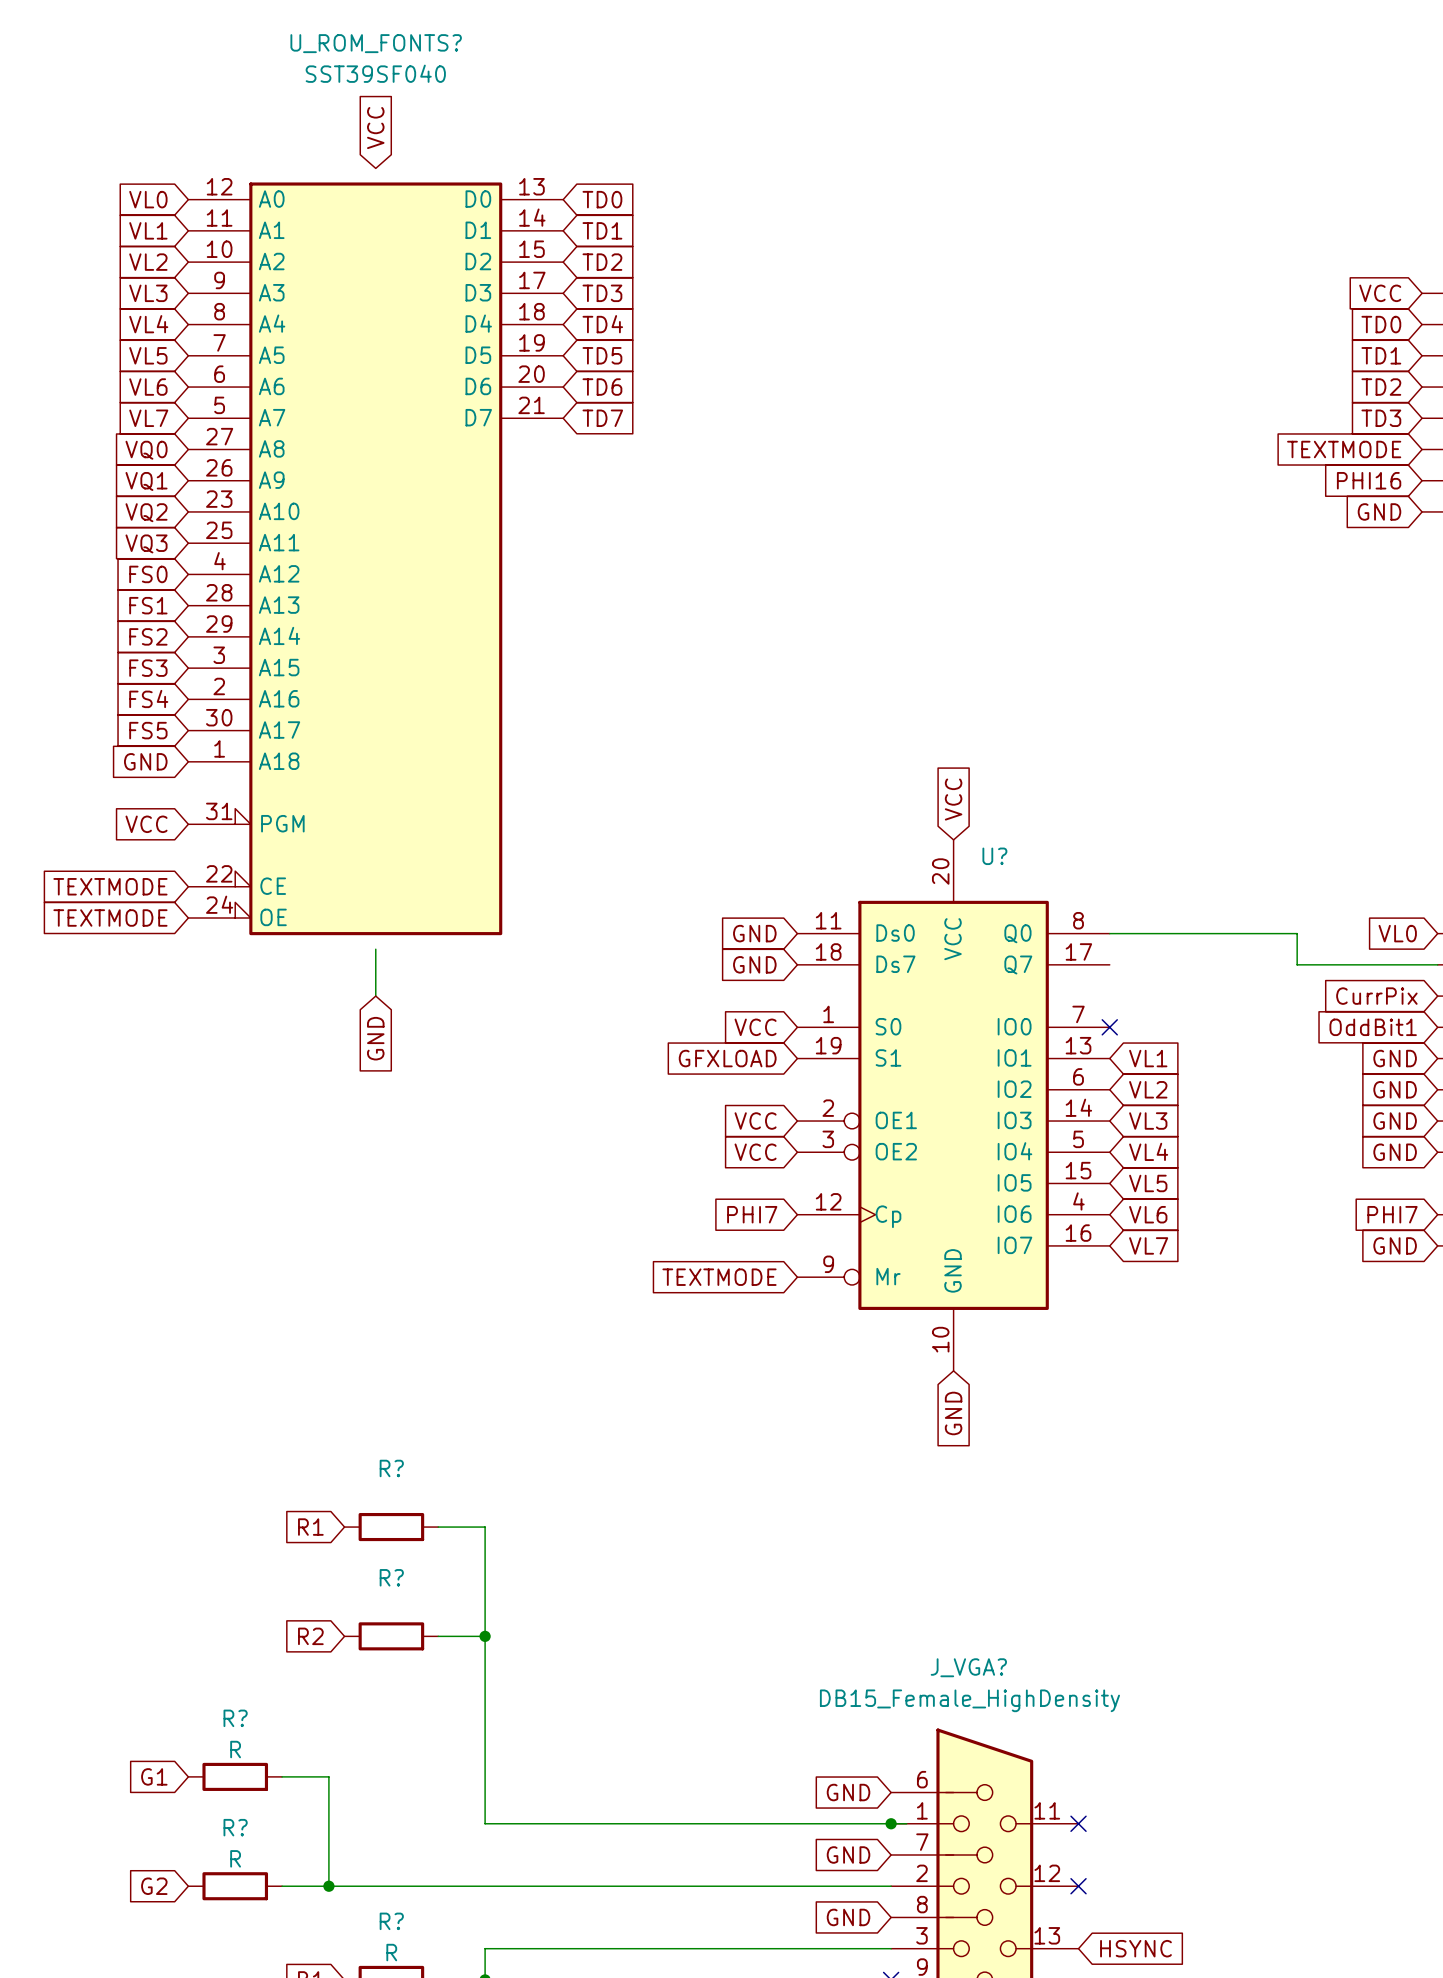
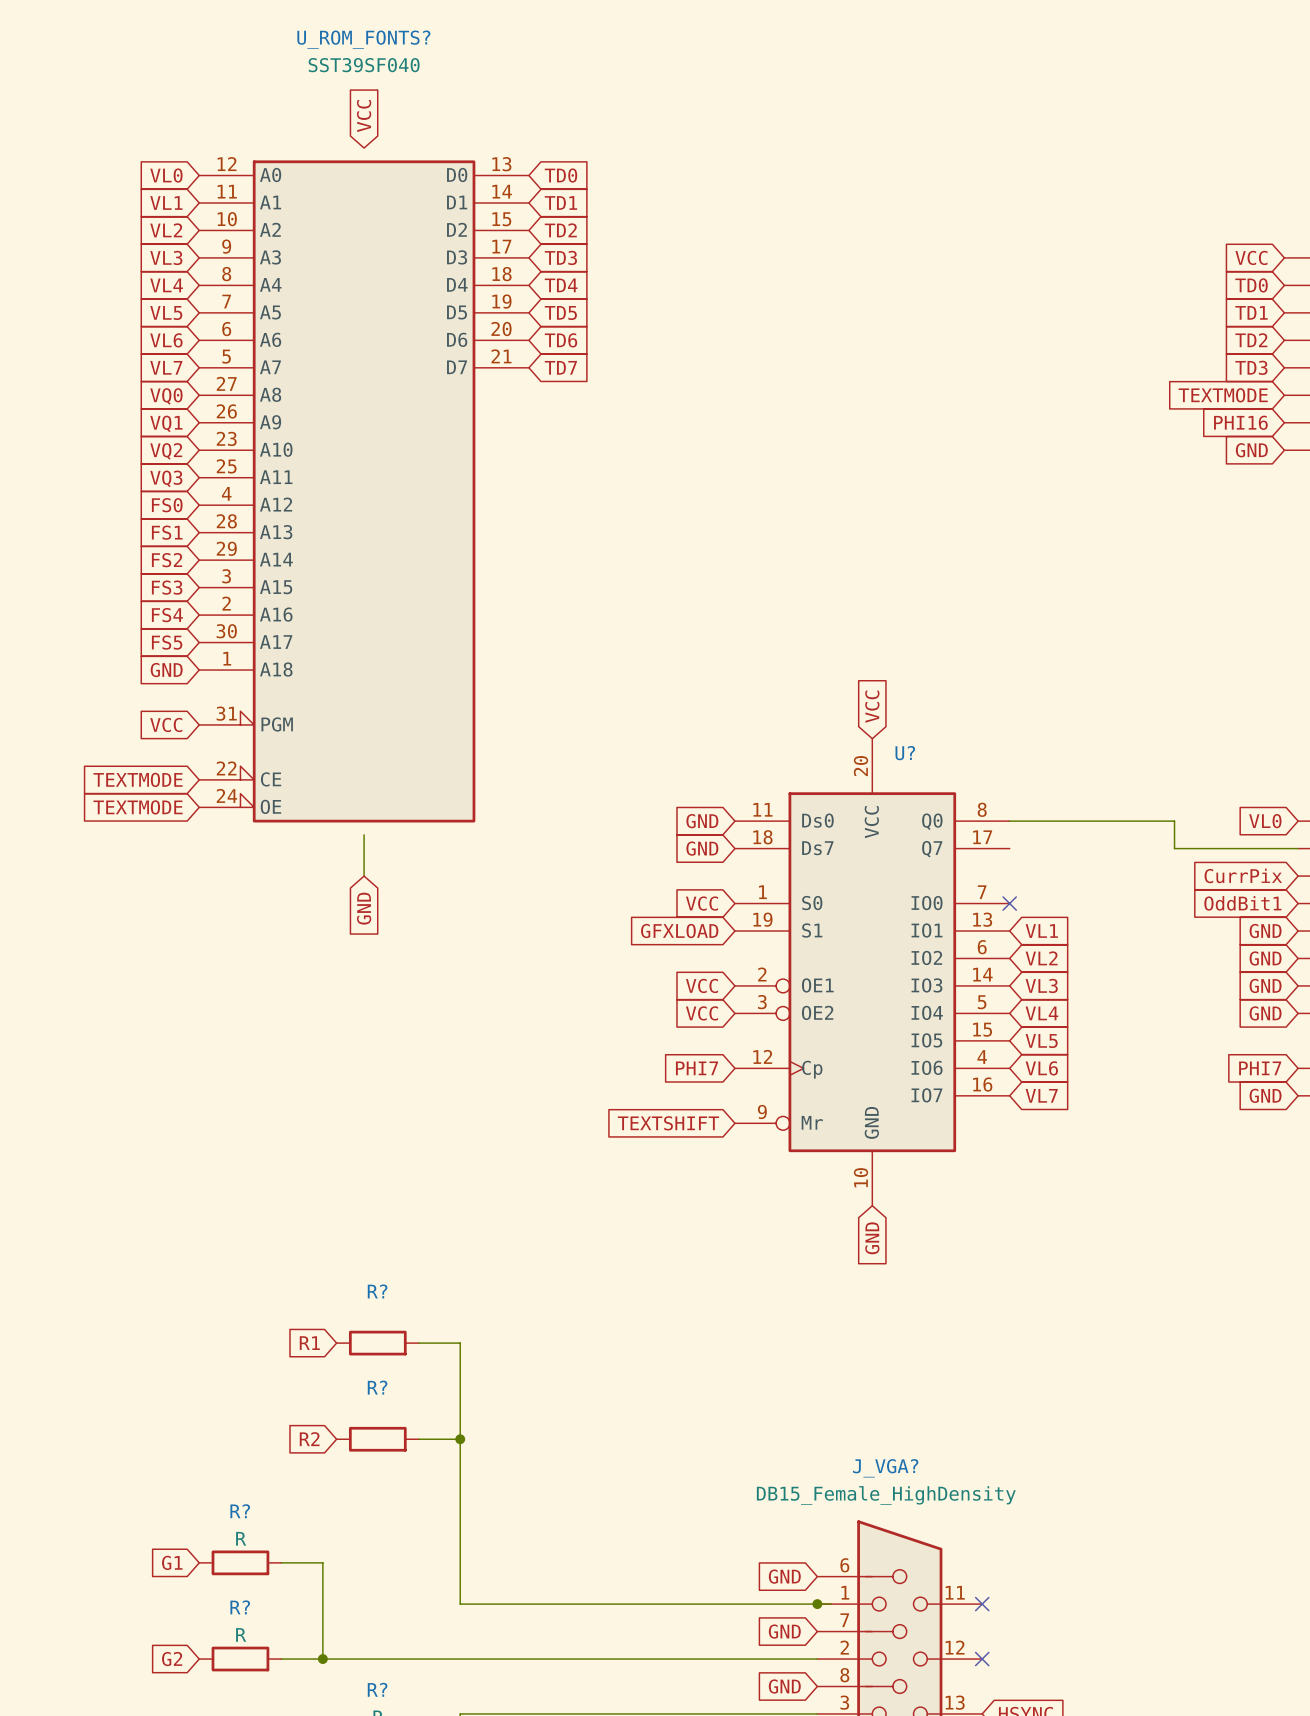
global label: TEXTMODE (719, 1277) -> TEXTSHIFT (668, 1123)

